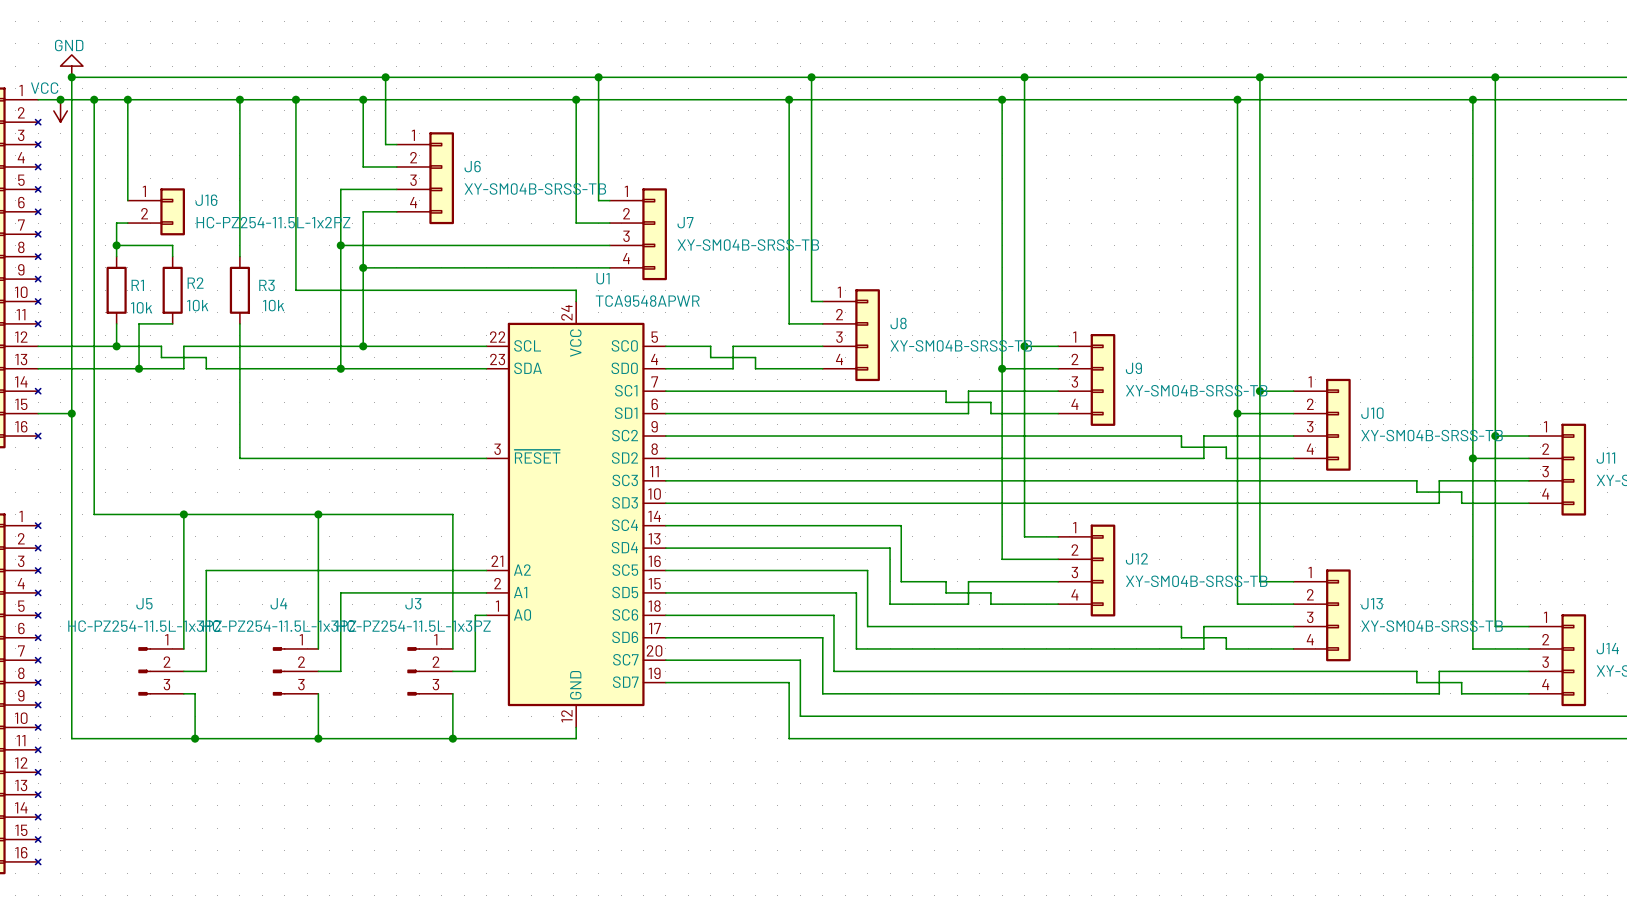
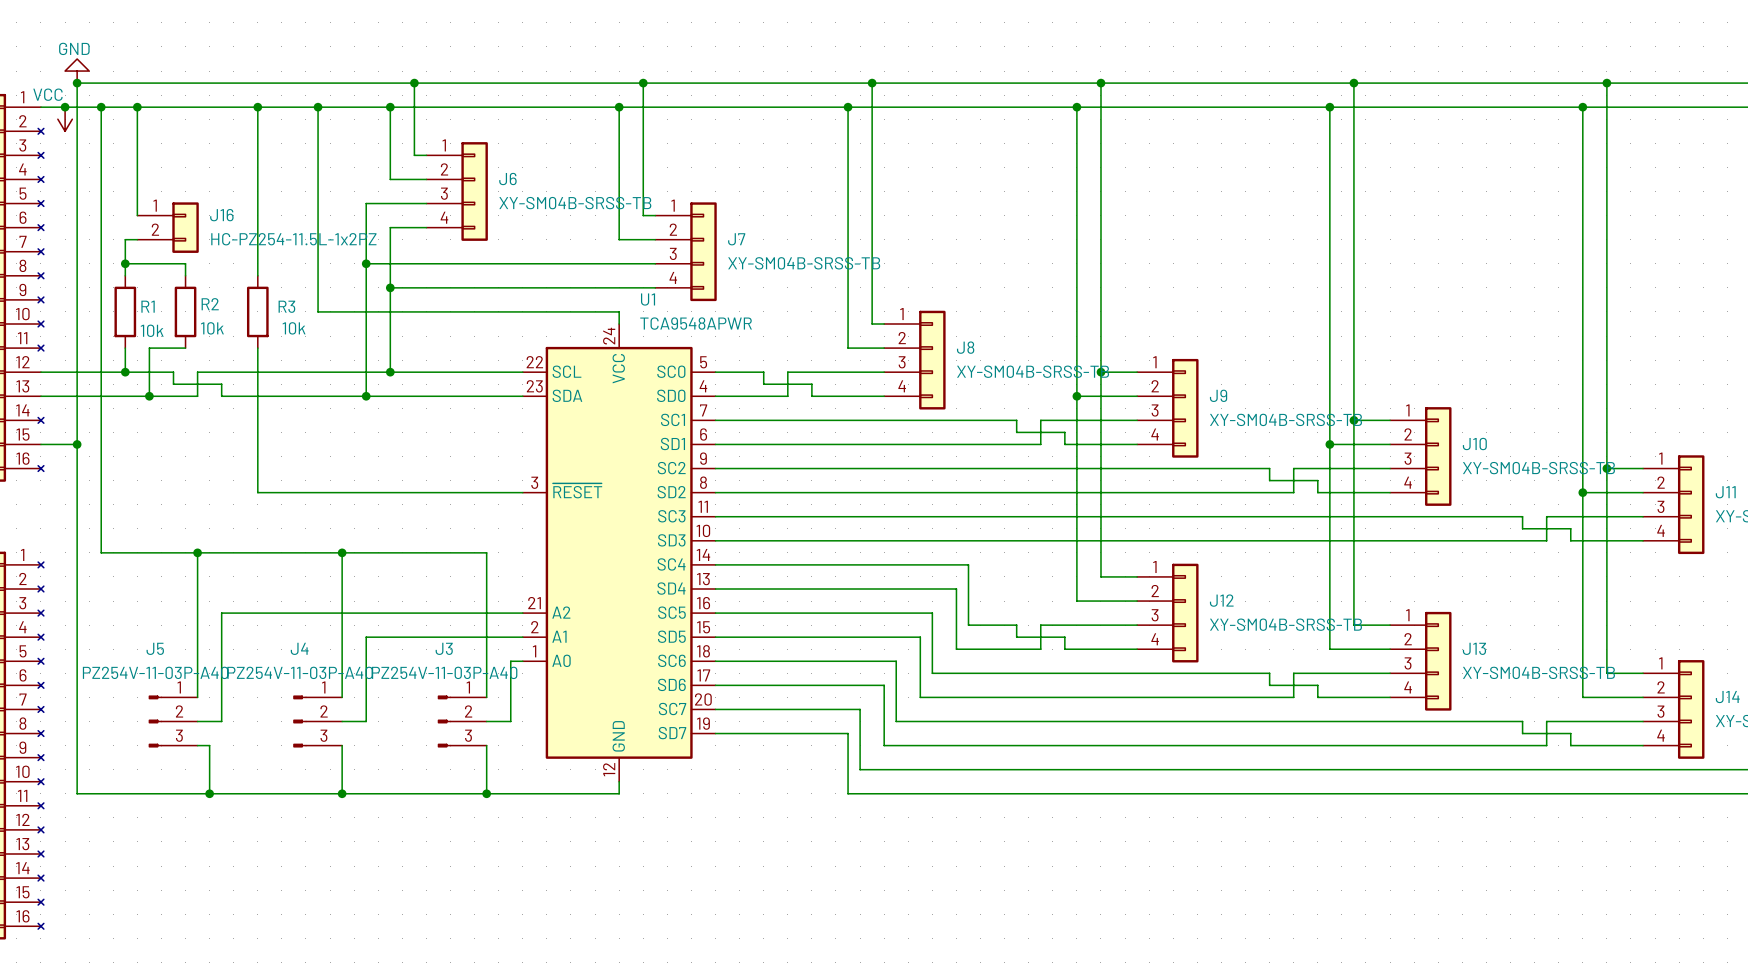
J5 value: HC-PZ254-11.5L-1x3PZ (144, 626) -> PZ254V-11-03P-A40 (155, 672)
J4 value: HC-PZ254-11.5L-1x3PZ (279, 626) -> PZ254V-11-03P-A40 (300, 672)
J3 value: HC-PZ254-11.5L-1x3PZ (413, 626) -> PZ254V-11-03P-A40 (444, 672)

